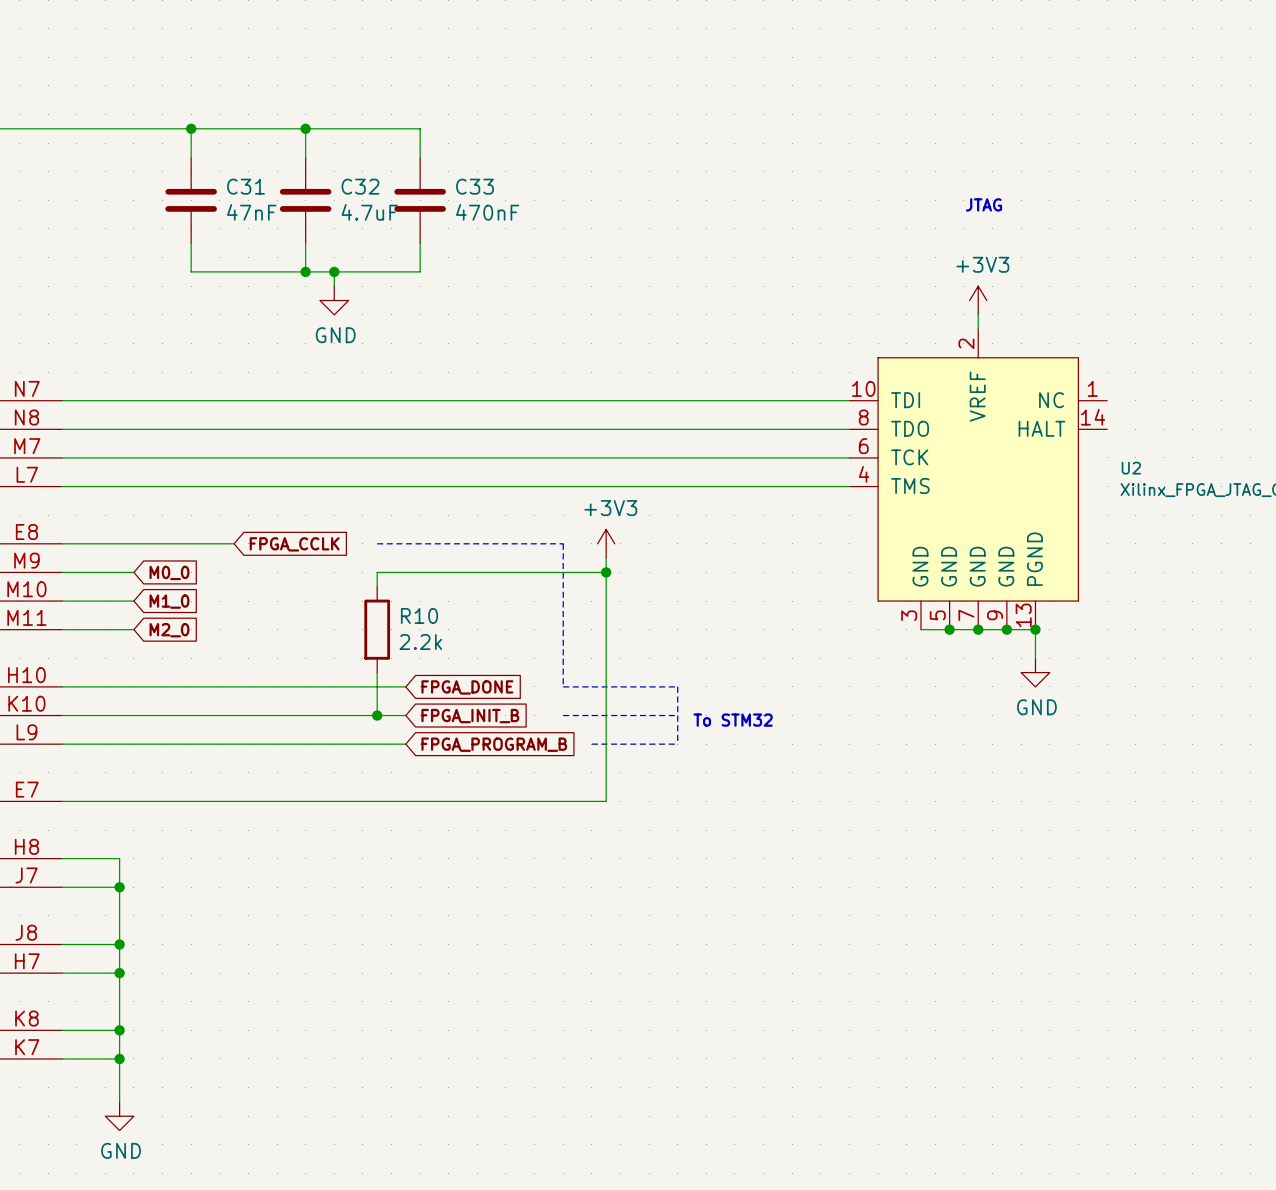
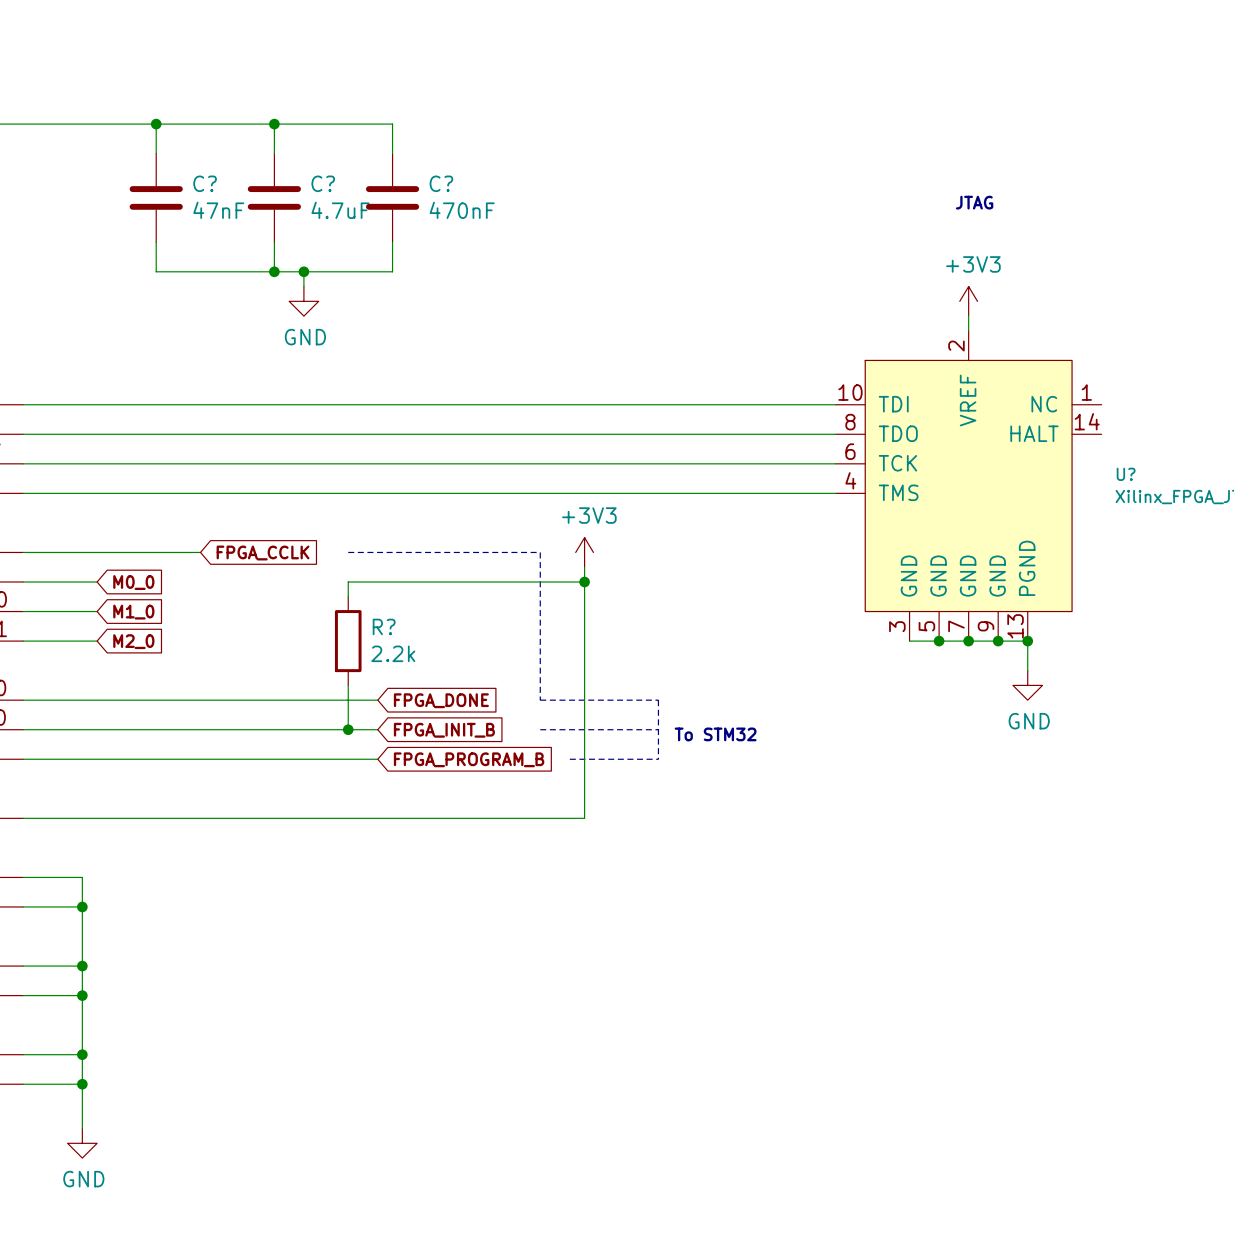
C31 name: C31 (245, 186) -> C? (205, 183)
C32 name: C32 (360, 186) -> C? (323, 183)
C33 name: C33 (474, 186) -> C? (441, 183)
U2 name: U2 (1131, 468) -> U? (1126, 474)
R10 name: R10 (419, 615) -> R? (384, 626)

